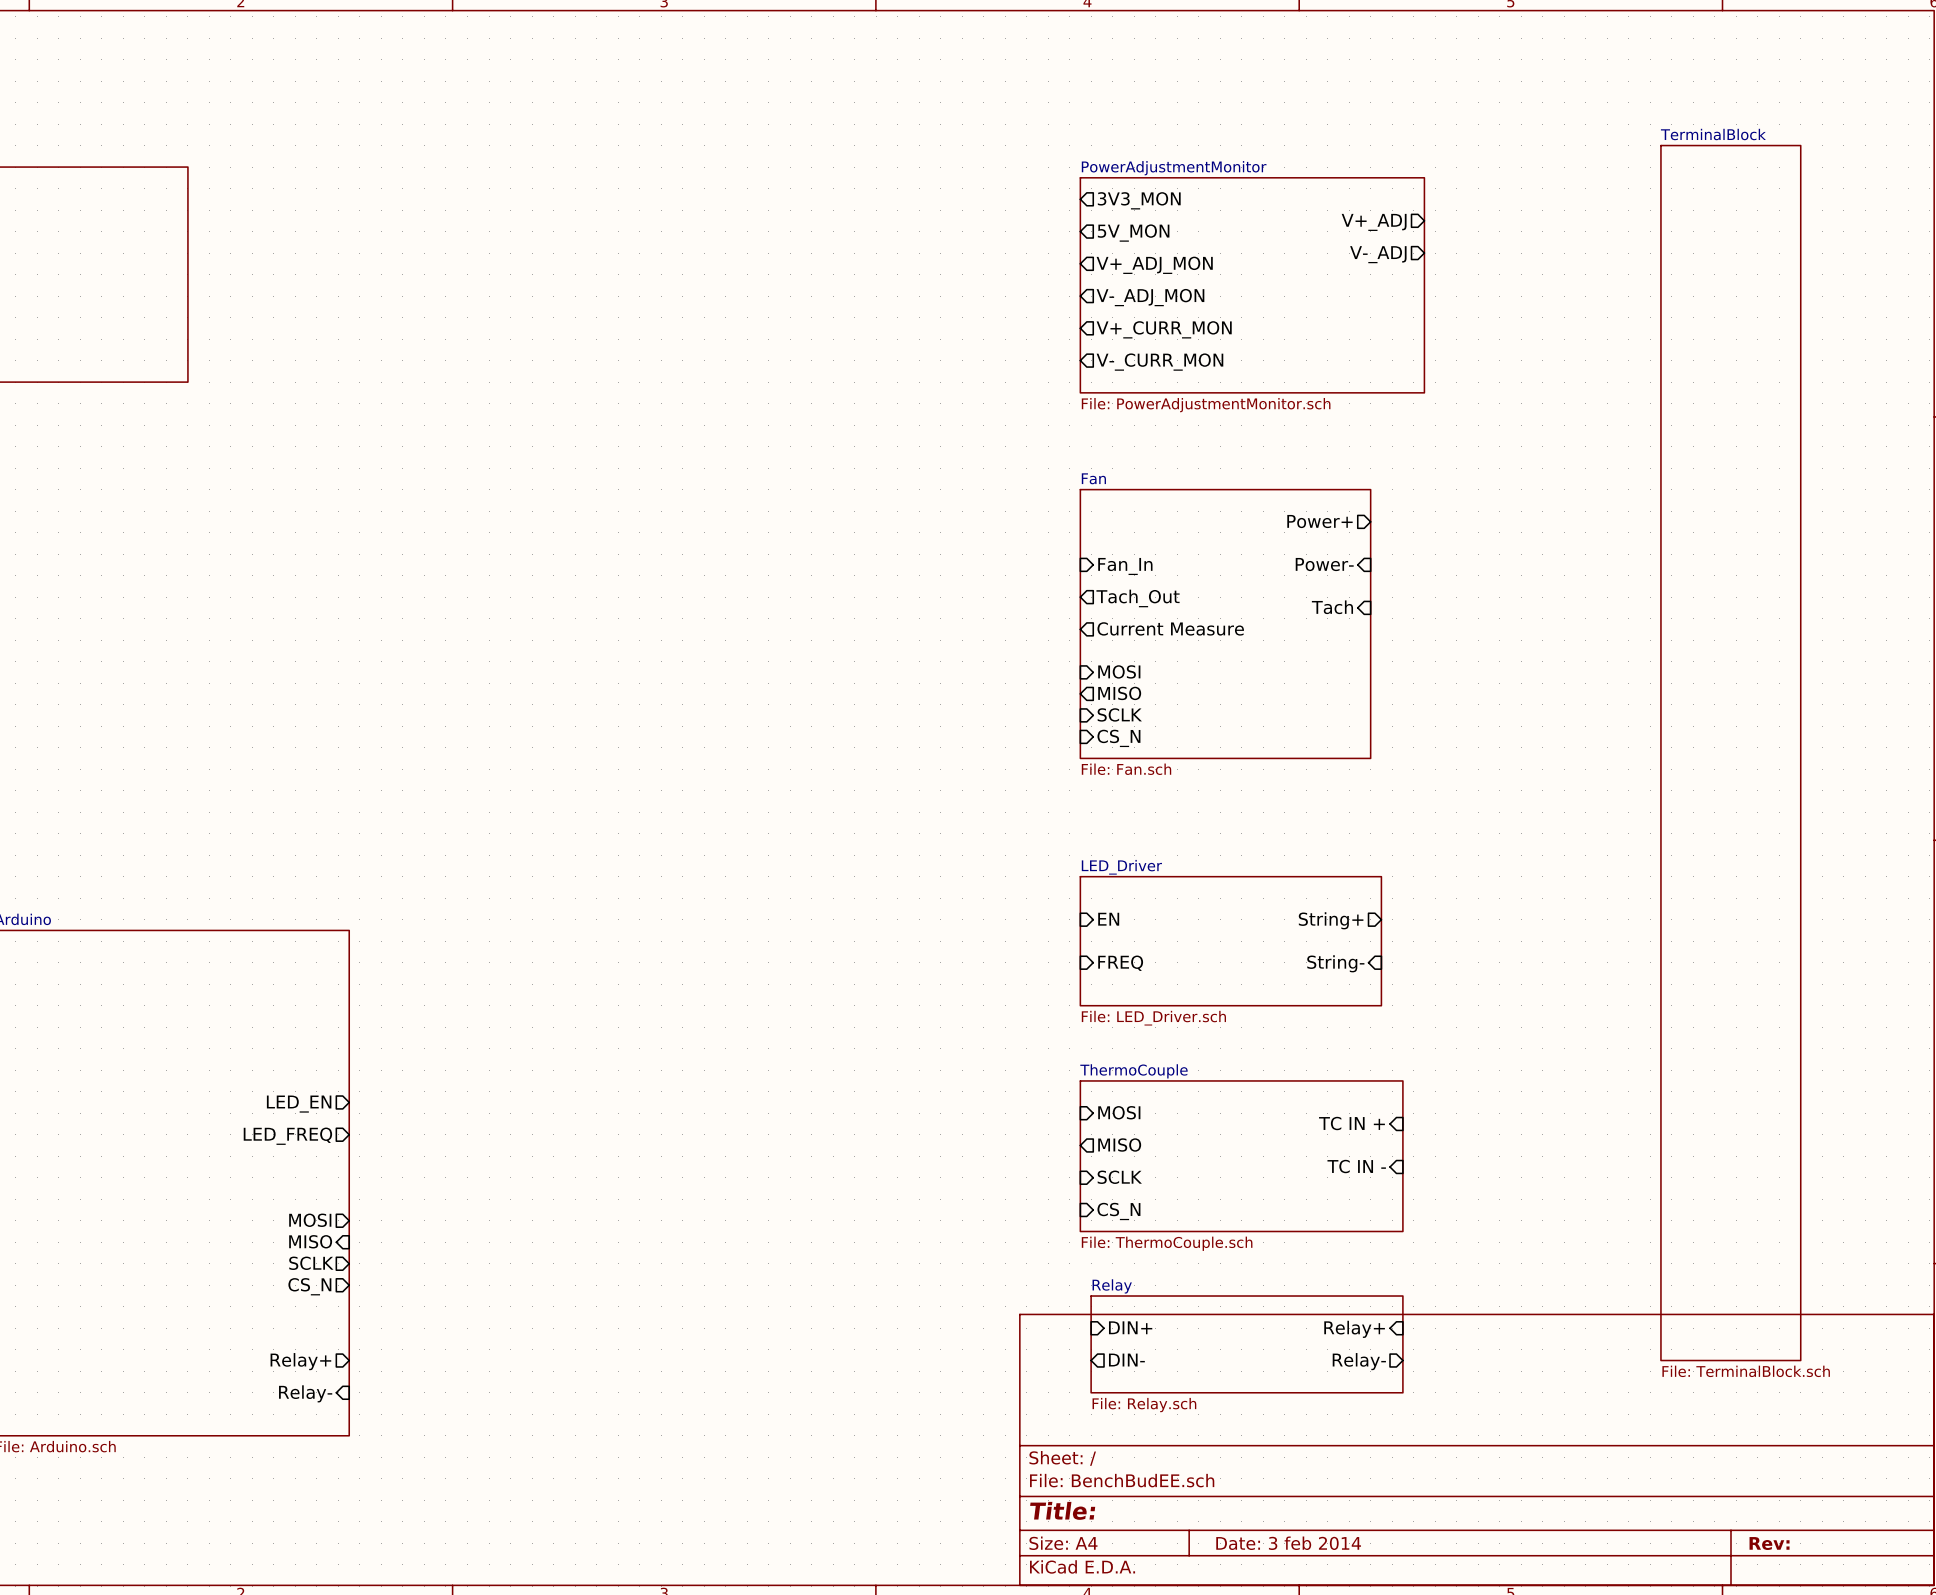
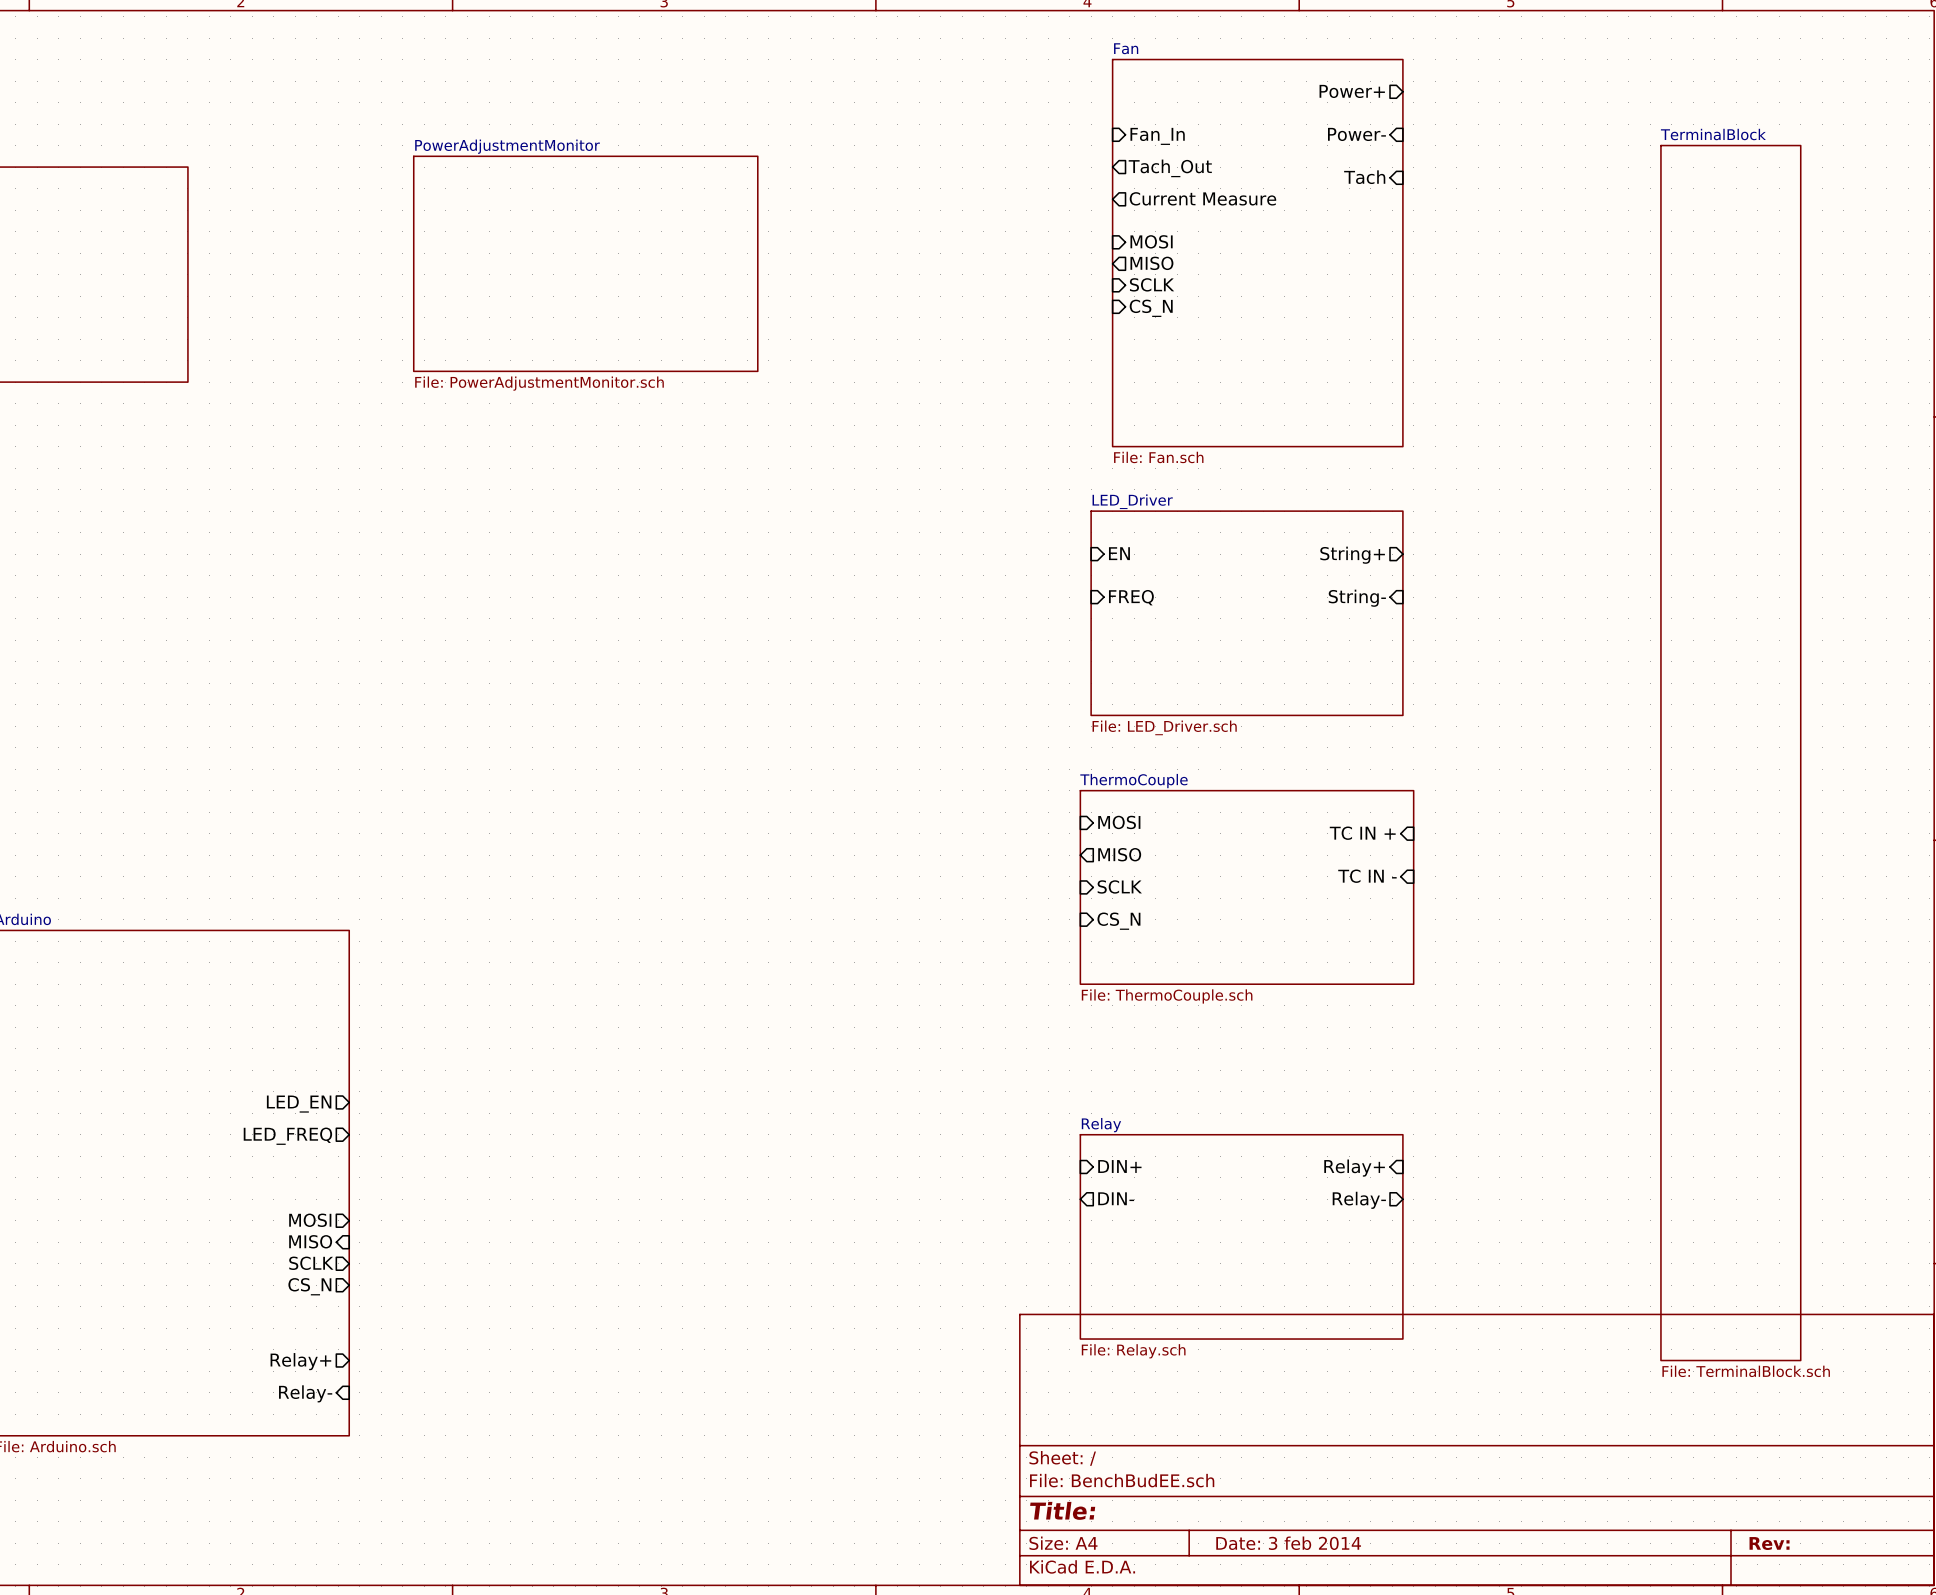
sheet pin: none -> Power+ (1352, 91)
sheet pin: none -> Power- (1356, 134)
sheet pin: none -> Fan_In (1157, 136)
sheet pin: none -> Tach_Out (1170, 168)
sheet pin: none -> Tach (1364, 177)
sheet pin: none -> Current Measure (1202, 198)
sheet pin: 3V3_MON (1139, 200) -> none
sheet pin: V+_ADJ (1374, 222) -> none
sheet pin: 5V_MON (1133, 233) -> none
sheet pin: none -> MOSI (1151, 241)
sheet Fan: none -> File: Fan.sch (1257, 253)
sheet pin: V-_ADJ (1378, 254) -> none
sheet PowerAdjustmentMonitor: none -> File: PowerAdjustmentMonitor.sch (585, 263)
sheet pin: none -> MISO (1151, 263)
sheet pin: V+_ADJ_MON (1154, 265) -> none
sheet pin: none -> SCLK (1152, 284)
sheet PowerAdjustmentMonitor: File: PowerAdjustmentMonitor.sch (1252, 285) -> none
sheet pin: V-_ADJ_MON (1150, 297) -> none
sheet pin: none -> CS_N (1151, 308)
sheet pin: V+_CURR_MON (1164, 329) -> none
sheet pin: V-_CURR_MON (1159, 362) -> none
sheet pin: Power+ (1319, 521) -> none
sheet pin: none -> EN (1119, 553)
sheet pin: none -> String+ (1352, 555)
sheet pin: Power- (1324, 564) -> none
sheet pin: Fan_In (1125, 566) -> none
sheet pin: none -> FREQ (1131, 597)
sheet pin: Tach_Out (1138, 598) -> none
sheet pin: none -> String- (1357, 598)
sheet pin: Tach (1332, 607) -> none
sheet LED_Driver: none -> File: LED_Driver.sch (1247, 613)
sheet Fan: File: Fan.sch (1225, 624) -> none
sheet pin: Current Measure (1170, 628) -> none
sheet pin: MOSI (1119, 671) -> none
sheet pin: MISO (1119, 693) -> none
sheet pin: SCLK (1119, 714) -> none
sheet pin: CS_N (1118, 738) -> none
sheet pin: none -> MOSI (1119, 822)
sheet pin: none -> TC IN + (1362, 833)
sheet pin: none -> MISO (1119, 854)
sheet pin: none -> TC IN - (1367, 876)
sheet pin: none -> SCLK (1119, 886)
sheet ThermoCouple: none -> File: ThermoCouple.sch (1247, 887)
sheet pin: EN (1108, 919) -> CS_N (1118, 921)
sheet pin: String+ (1331, 920) -> none
sheet LED_Driver: File: LED_Driver.sch (1230, 941) -> none
sheet pin: FREQ (1120, 963) -> none
sheet pin: String- (1335, 963) -> none
sheet pin: MOSI (1119, 1112) -> none
sheet pin: TC IN + (1351, 1123) -> none
sheet pin: MISO (1119, 1145) -> none
sheet ThermoCouple: File: ThermoCouple.sch (1241, 1156) -> none
sheet pin: TC IN - (1356, 1166) -> Relay+ (1354, 1168)
sheet pin: SCLK (1119, 1177) -> none
sheet pin: CS_N (1118, 1211) -> none
sheet Relay: none -> File: Relay.sch (1241, 1236)
sheet pin position: DIN+ (1130, 1327) -> DIN+ (1119, 1166)
sheet pin: Relay+ (1354, 1329) -> none
sheet Relay: File: Relay.sch (1247, 1344) -> none
sheet pin position: DIN- (1126, 1360) -> DIN- (1116, 1198)
sheet pin position: Relay- (1359, 1361) -> Relay- (1359, 1200)

